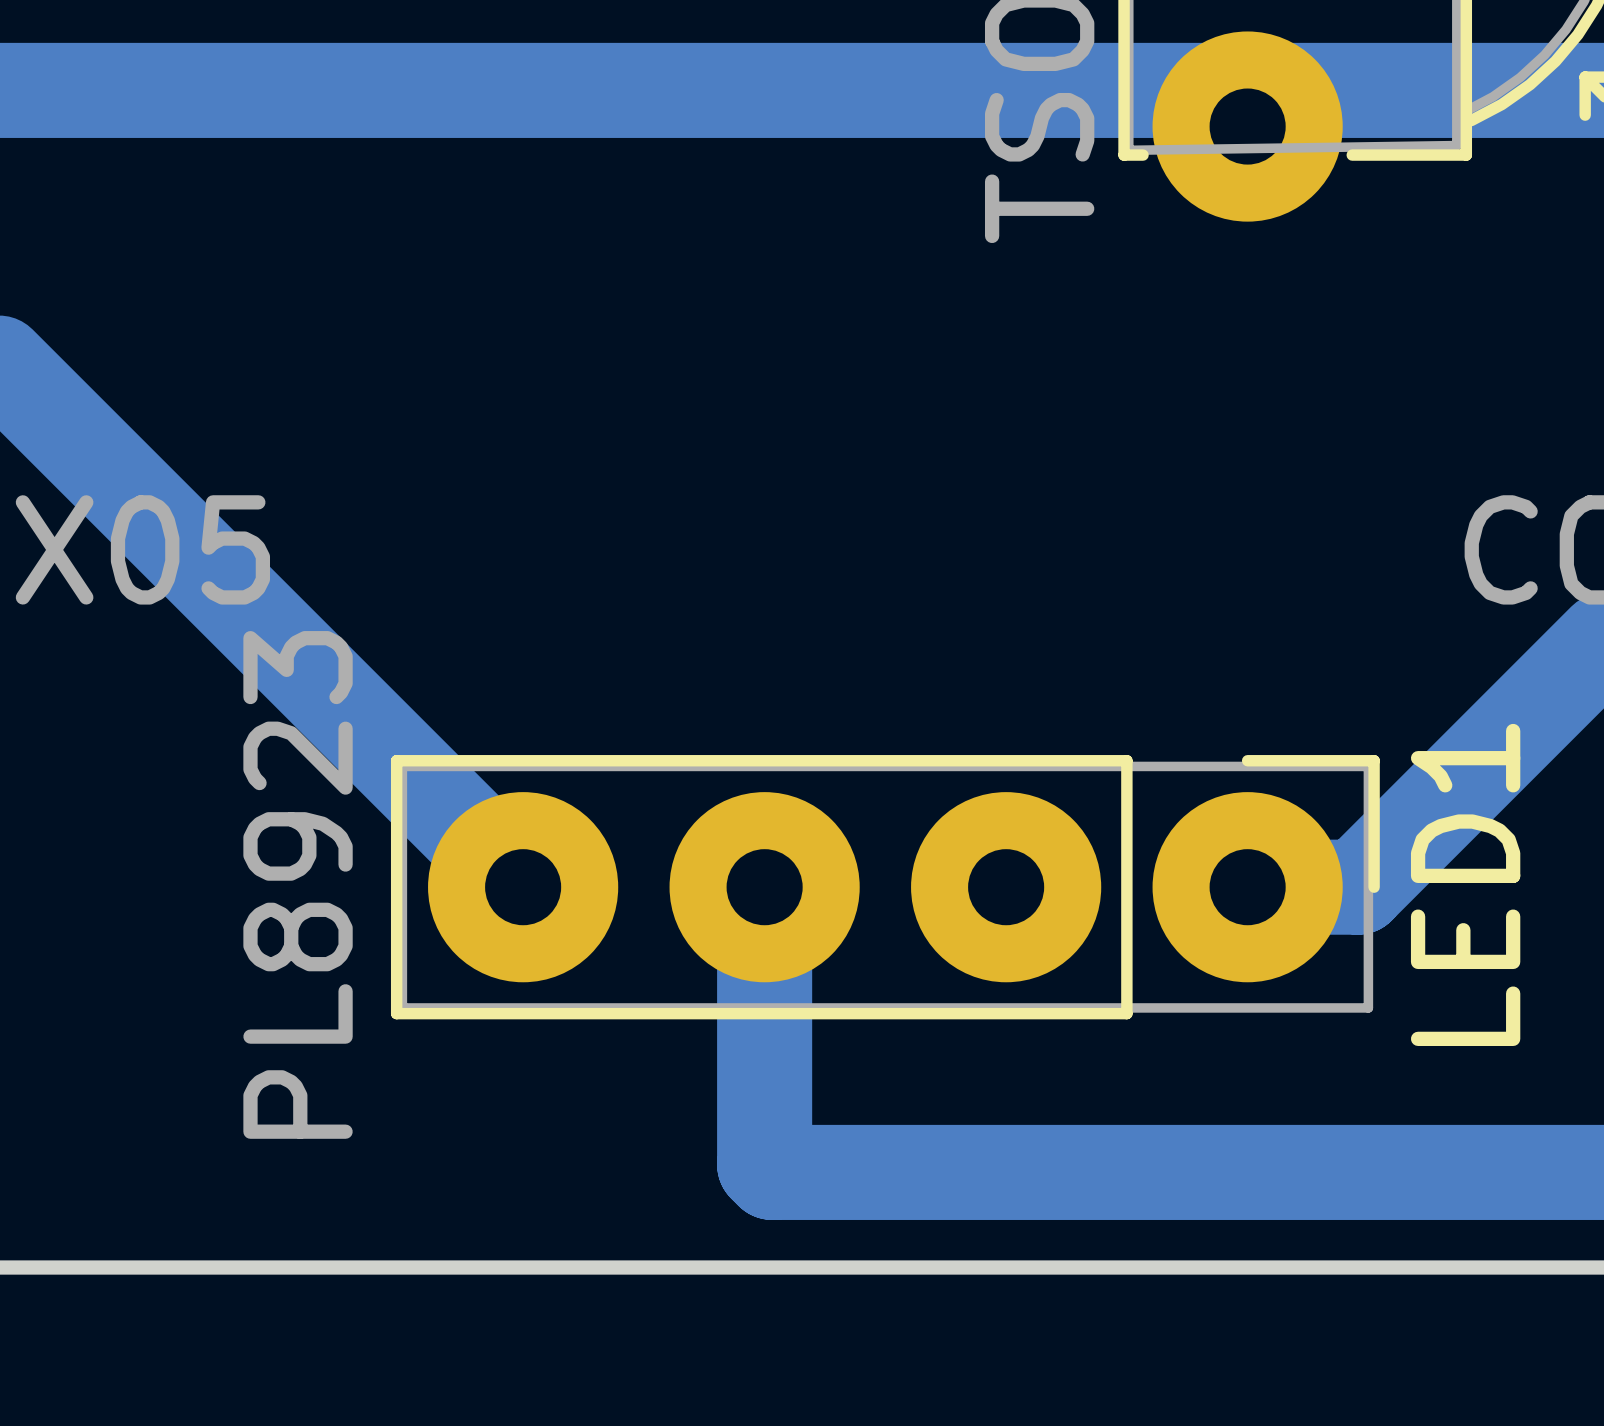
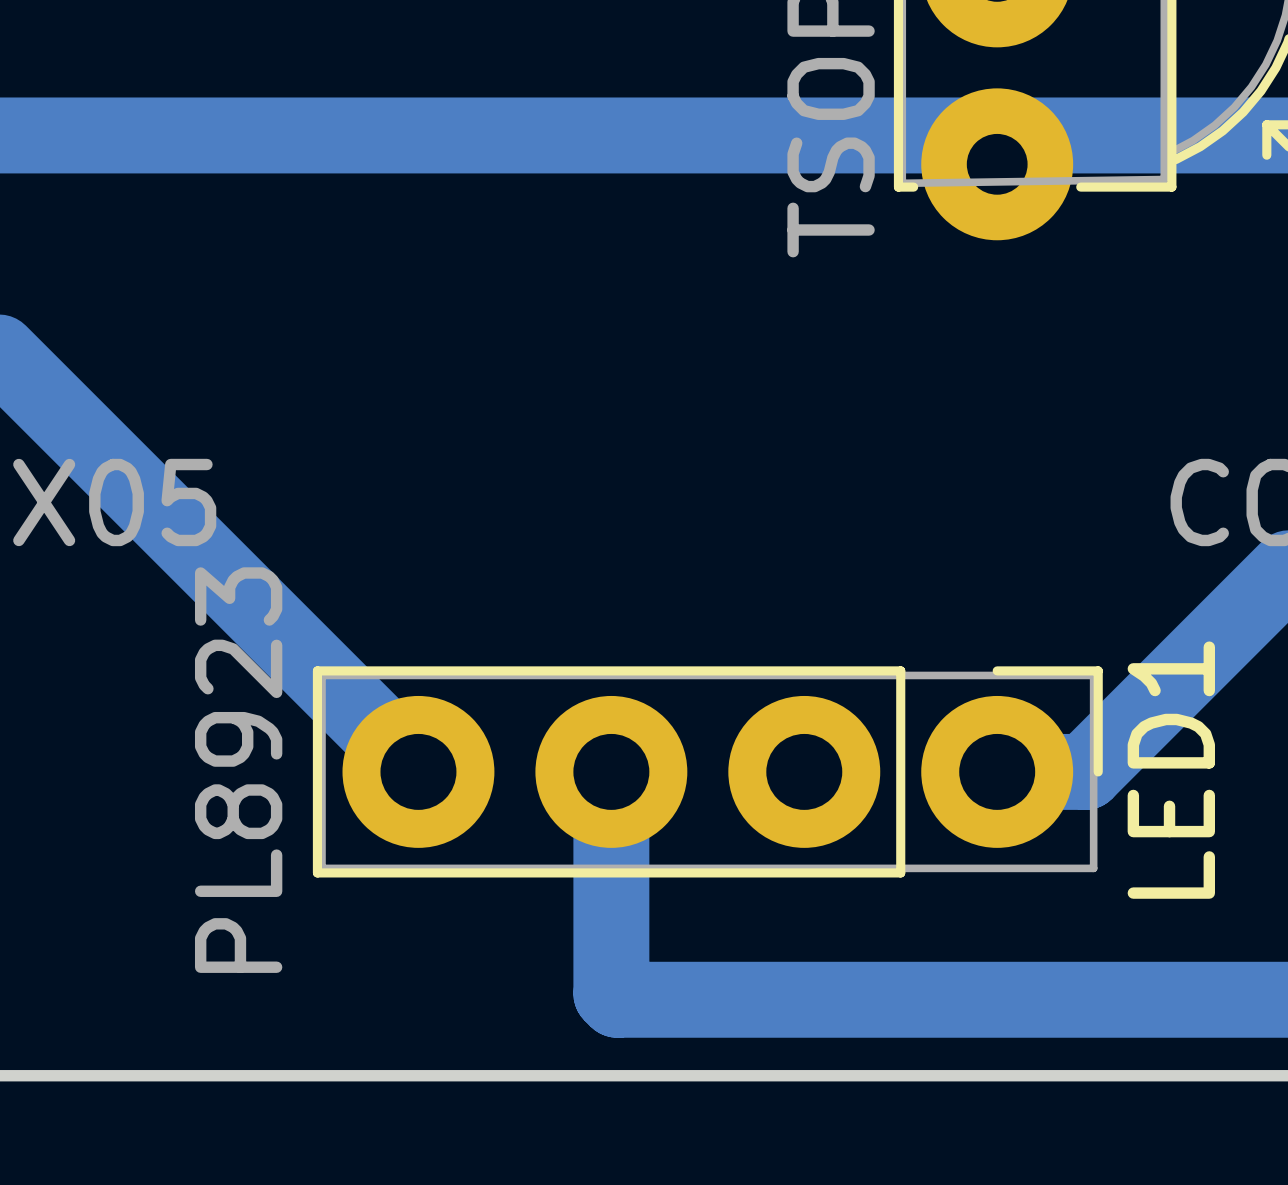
LED1 footprint: [390, 755, 1380, 1020] -> [312, 666, 1103, 878]

